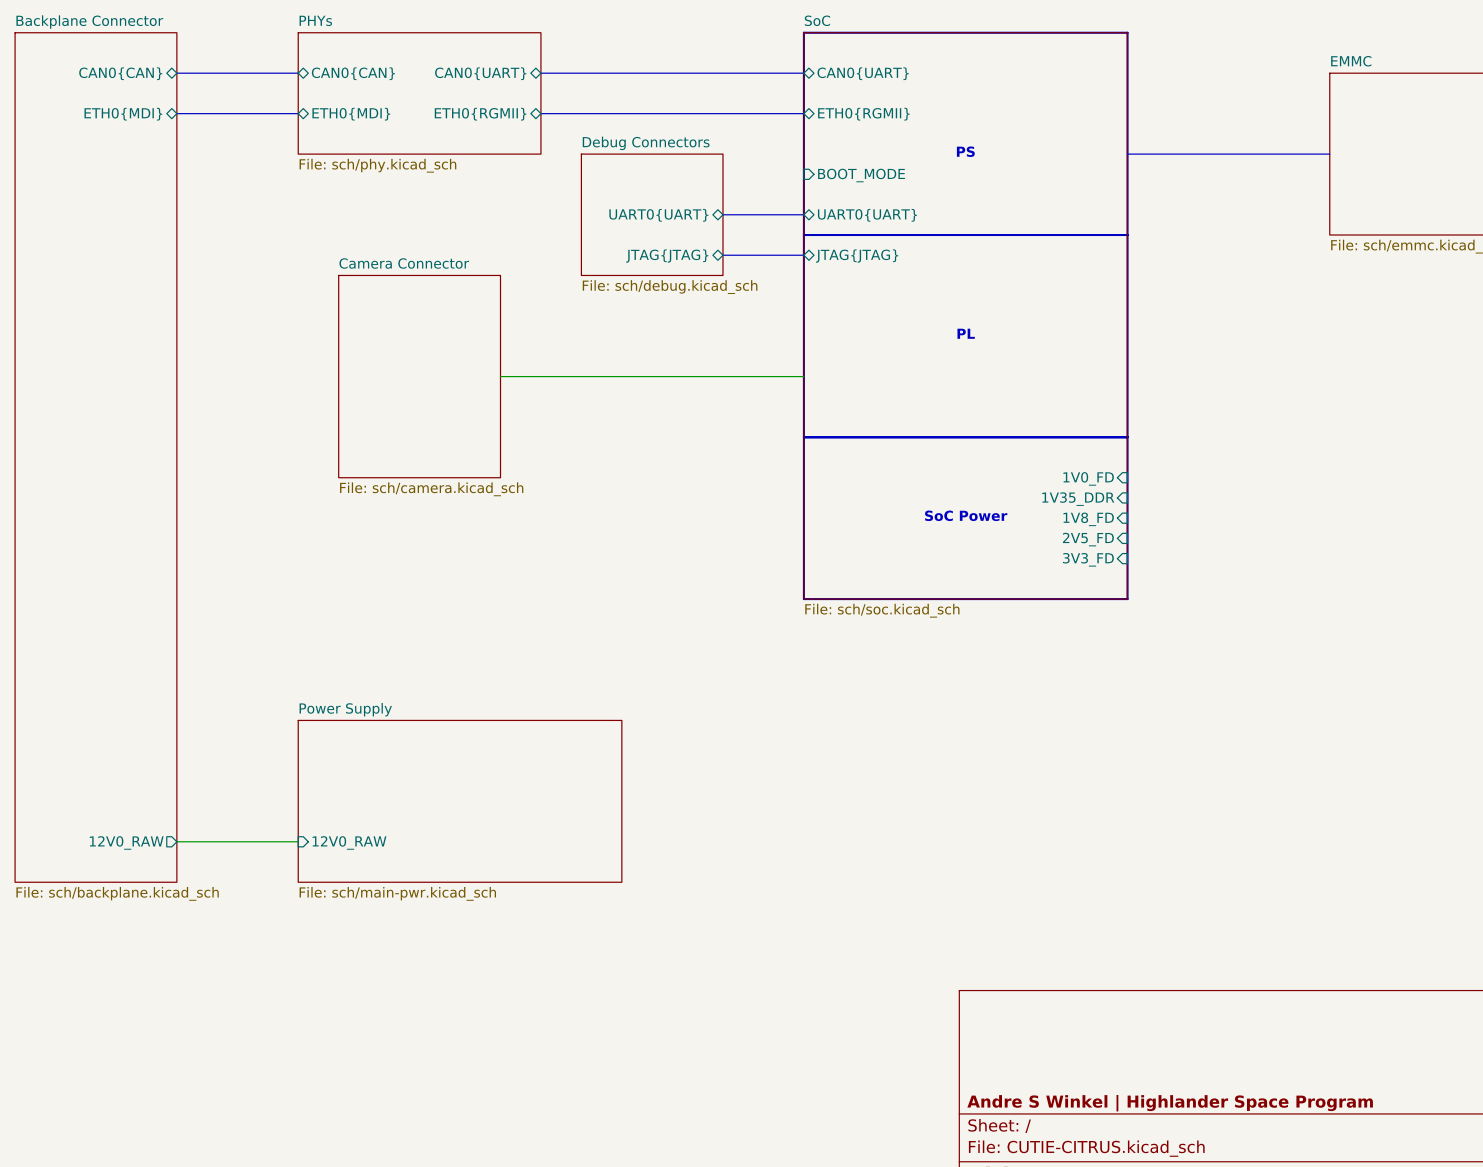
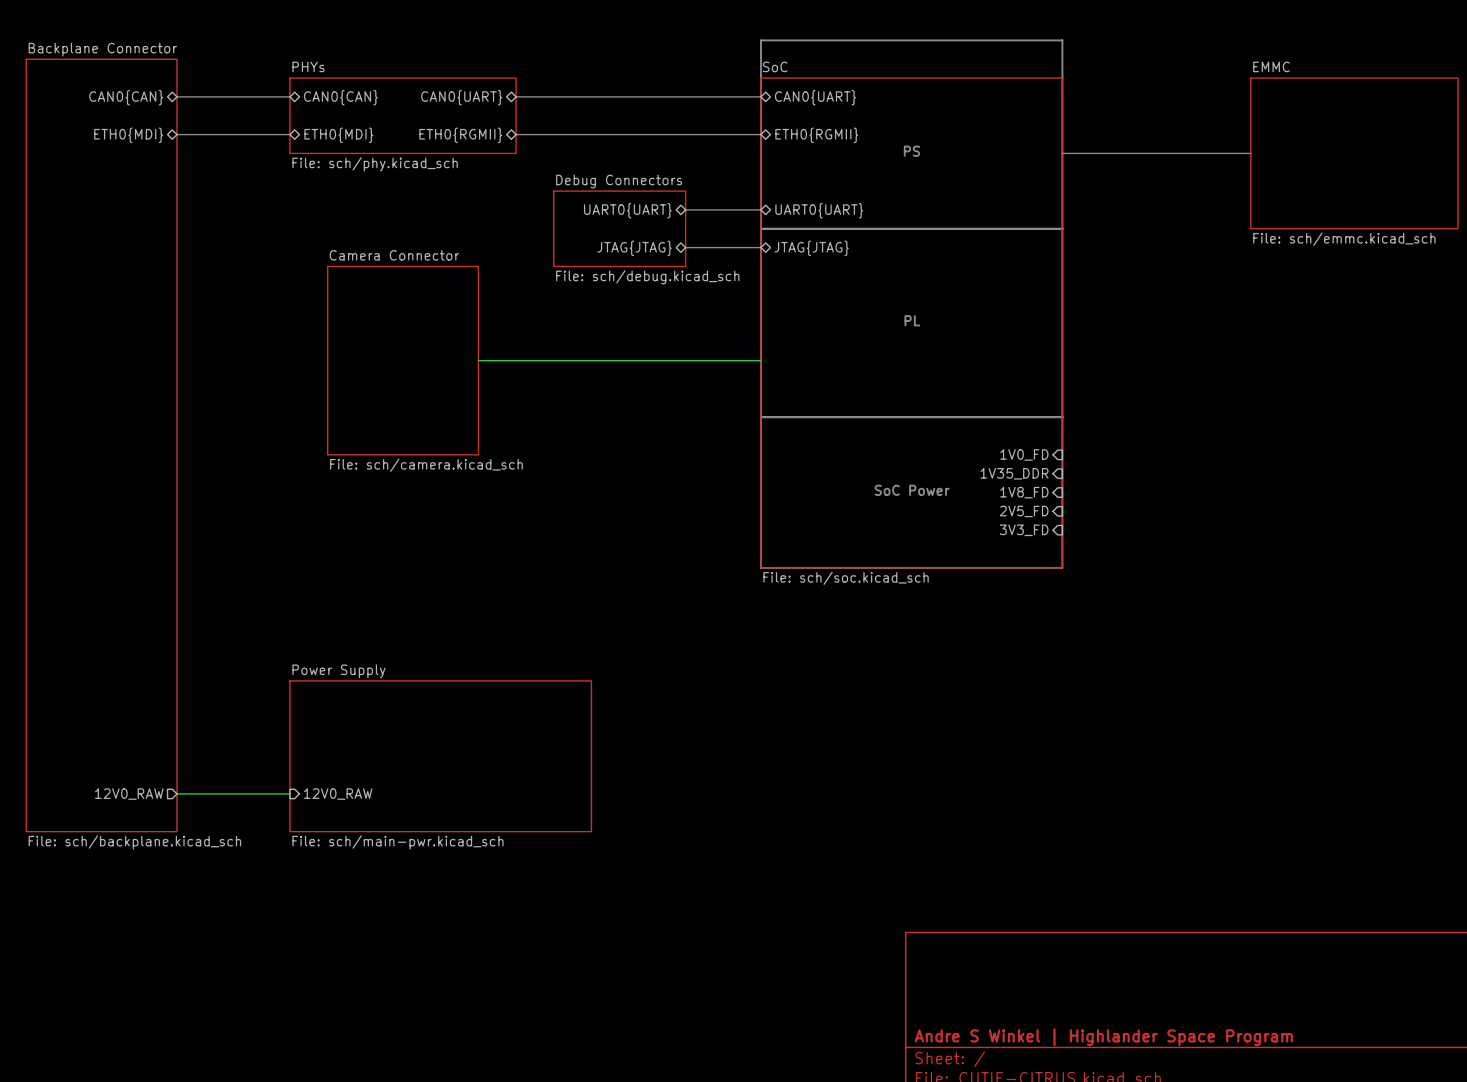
sheet pin position: CAN0{CAN} (120, 73) -> CAN0{CAN} (126, 97)
bus: (176, 73) (298, 73) -> (176, 96) (290, 96)
sheet pin position: CAN0{CAN} (353, 73) -> CAN0{CAN} (340, 97)
sheet pin position: CAN0{UART} (480, 73) -> CAN0{UART} (461, 97)
bus: (540, 73) (803, 73) -> (516, 96) (760, 96)
sheet pin position: CAN0{UART} (863, 73) -> CAN0{UART} (815, 97)
sheet PHYs: File: sch/phy.kicad_sch (419, 93) -> none
bus: (176, 113) (298, 113) -> (176, 134) (290, 134)
sheet PHYs: none -> File: sch/phy.kicad_sch (403, 115)
bus: (540, 113) (803, 113) -> (516, 134) (760, 134)
sheet pin position: ETH0{MDI} (123, 114) -> ETH0{MDI} (128, 135)
sheet pin position: ETH0{MDI} (351, 114) -> ETH0{MDI} (338, 135)
sheet pin position: ETH0{RGMII} (480, 114) -> ETH0{RGMII} (460, 135)
sheet pin position: ETH0{RGMII} (863, 114) -> ETH0{RGMII} (816, 135)
sheet pin: BOOT_MODE (861, 175) -> none
sheet Debug Connectors: File: sch/debug.kicad_sch (652, 214) -> none
sheet Debug Connectors: none -> File: sch/debug.kicad_sch (619, 228)
sheet SoC: File: sch/soc.kicad_sch (965, 315) -> none
sheet SoC: none -> File: sch/soc.kicad_sch (911, 322)
sheet Backplane Connector: File: sch/backplane.kicad_sch (95, 457) -> none
sheet Backplane Connector: none -> File: sch/backplane.kicad_sch (101, 445)

